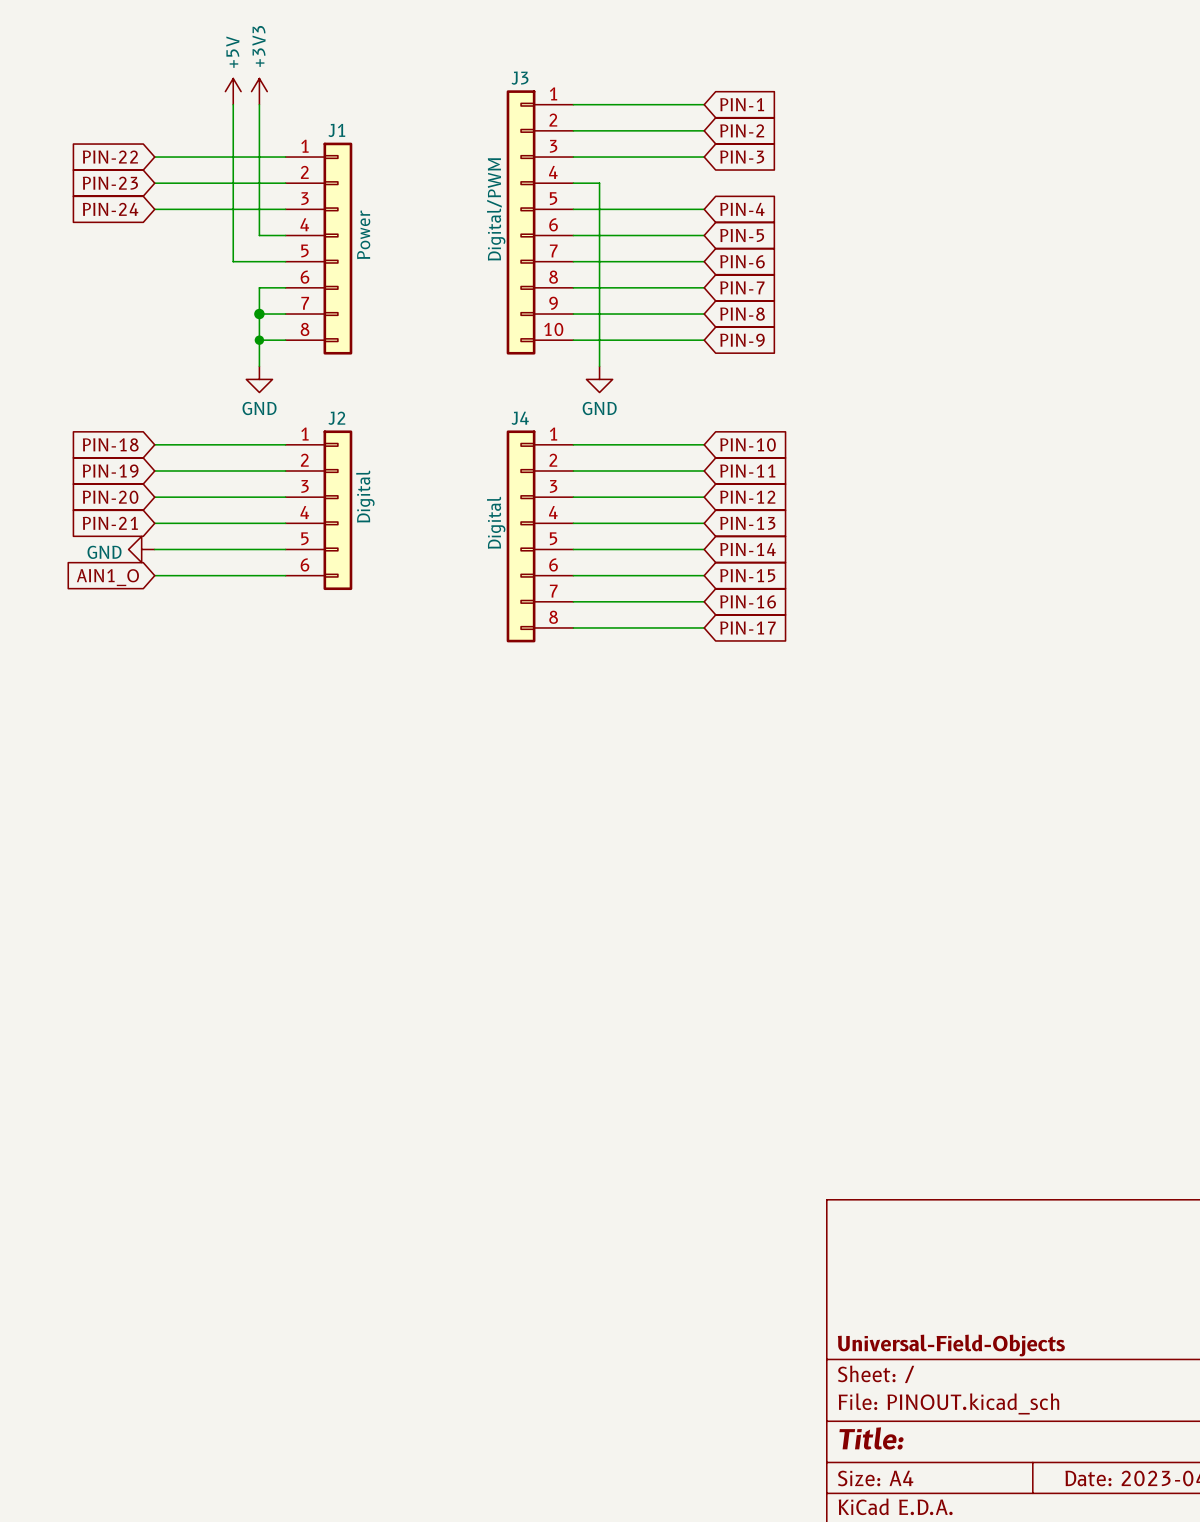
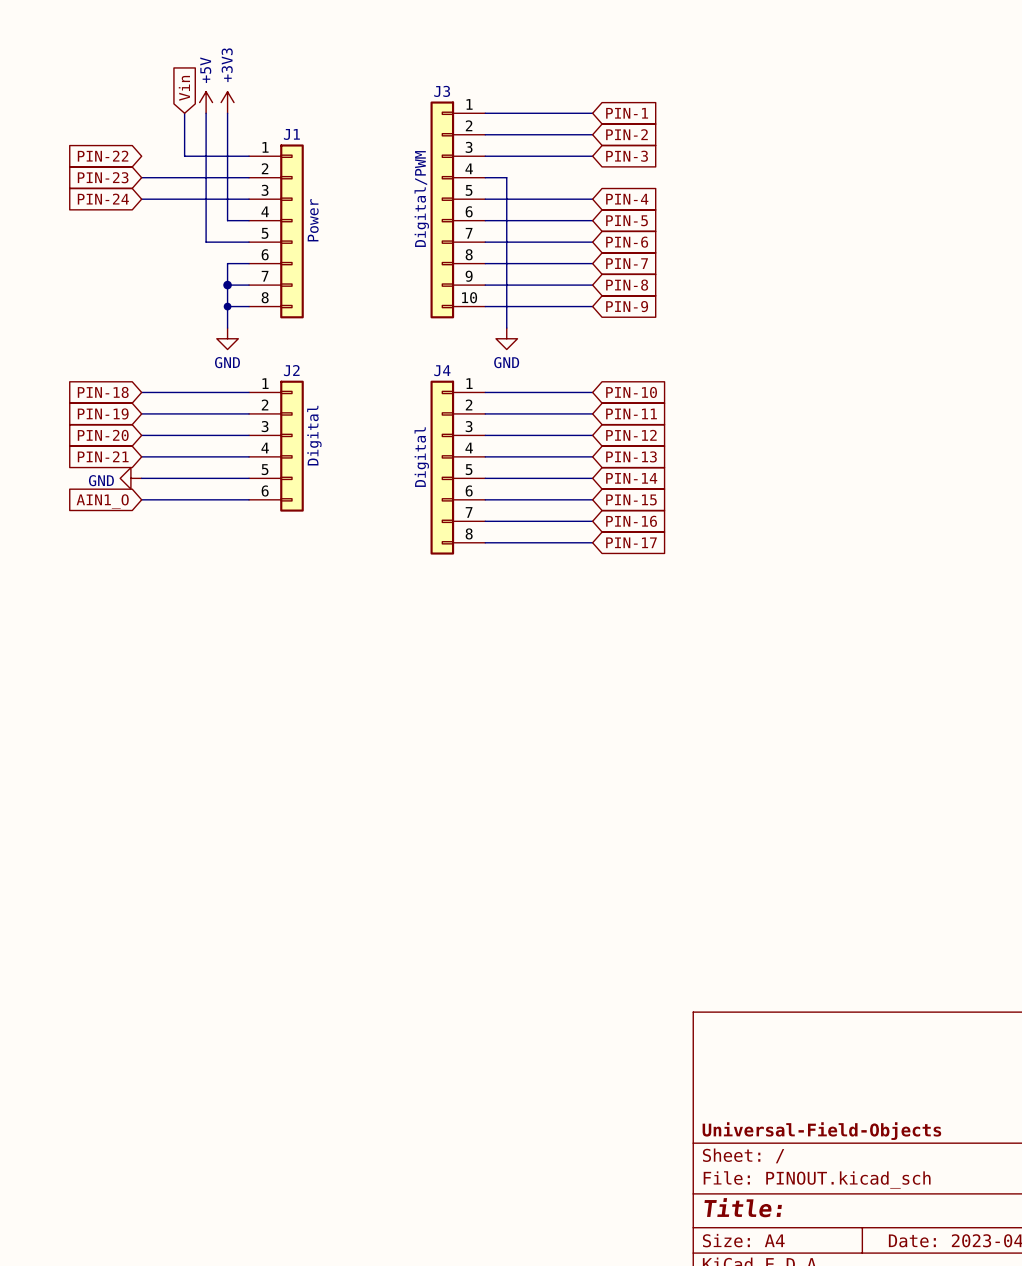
global label: none -> Vin (184, 88)
wire: (154, 157) (207, 157) -> (184, 113) (184, 156)

